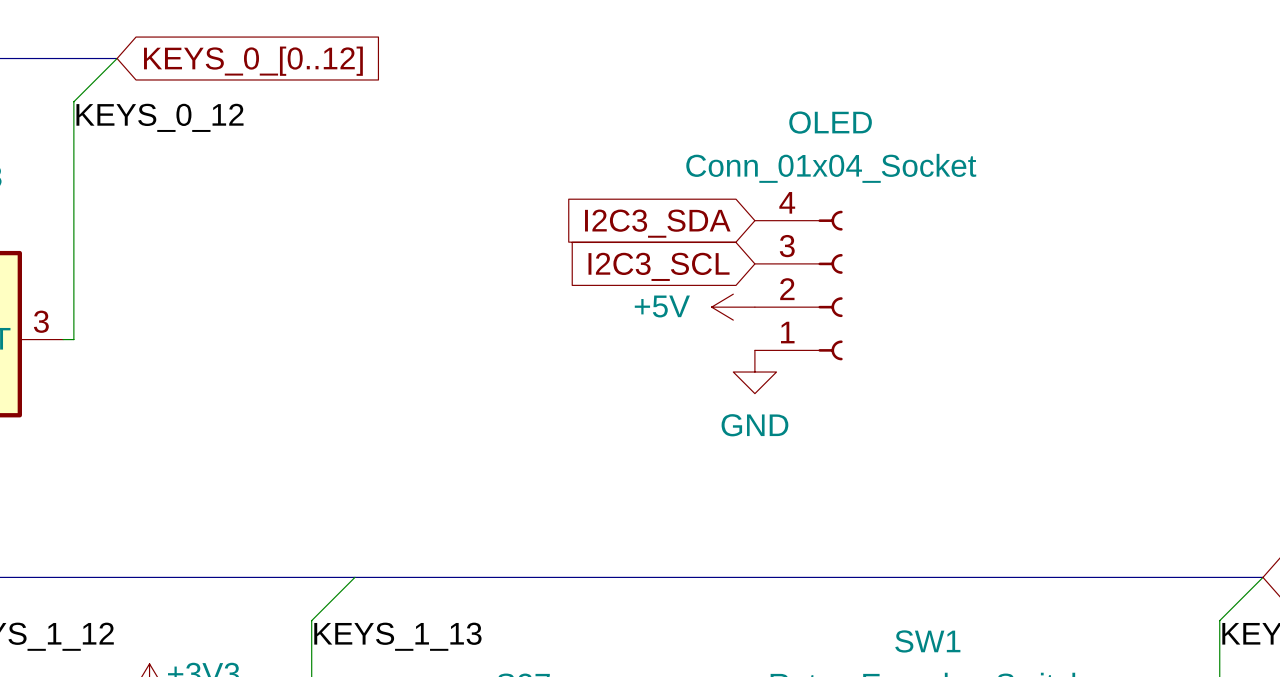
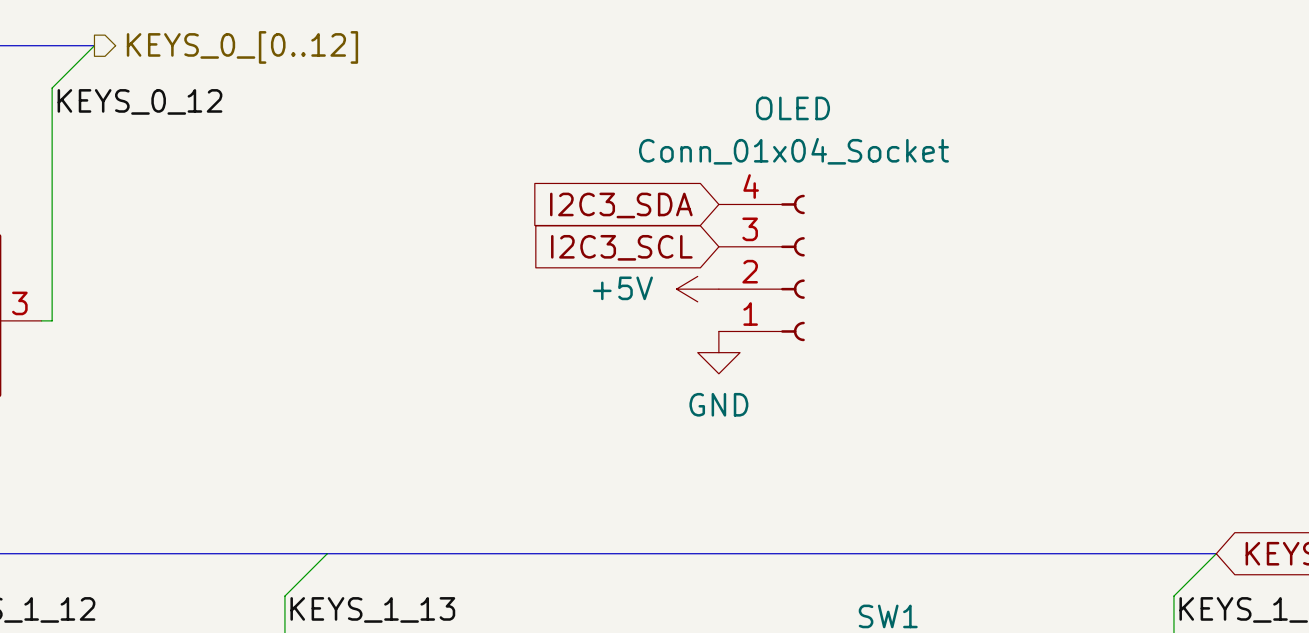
hierarchical label: none -> KEYS_0_[0..12] (242, 47)
global label: KEYS_0_[0..12] (253, 61) -> none

